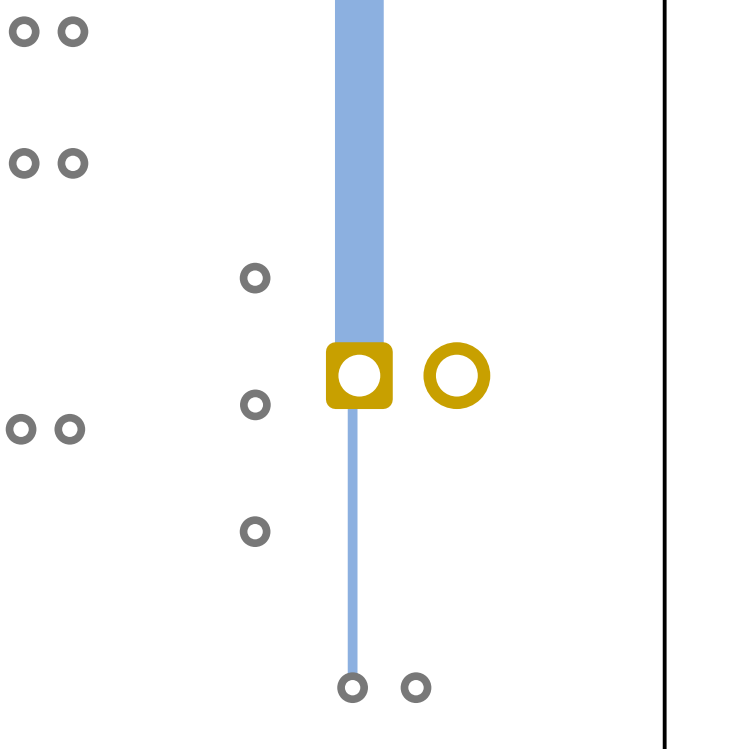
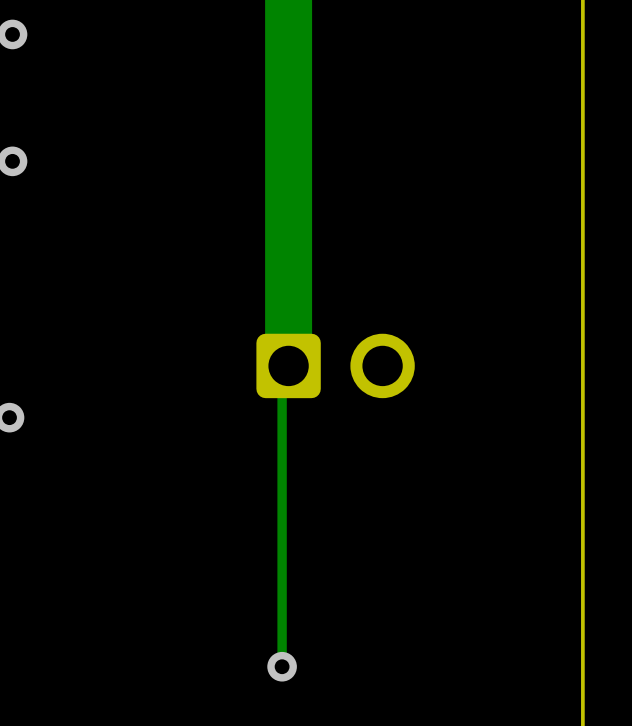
via: (255, 278) -> none
via: (255, 404) -> none
via: (255, 531) -> none
via: (416, 687) -> none

